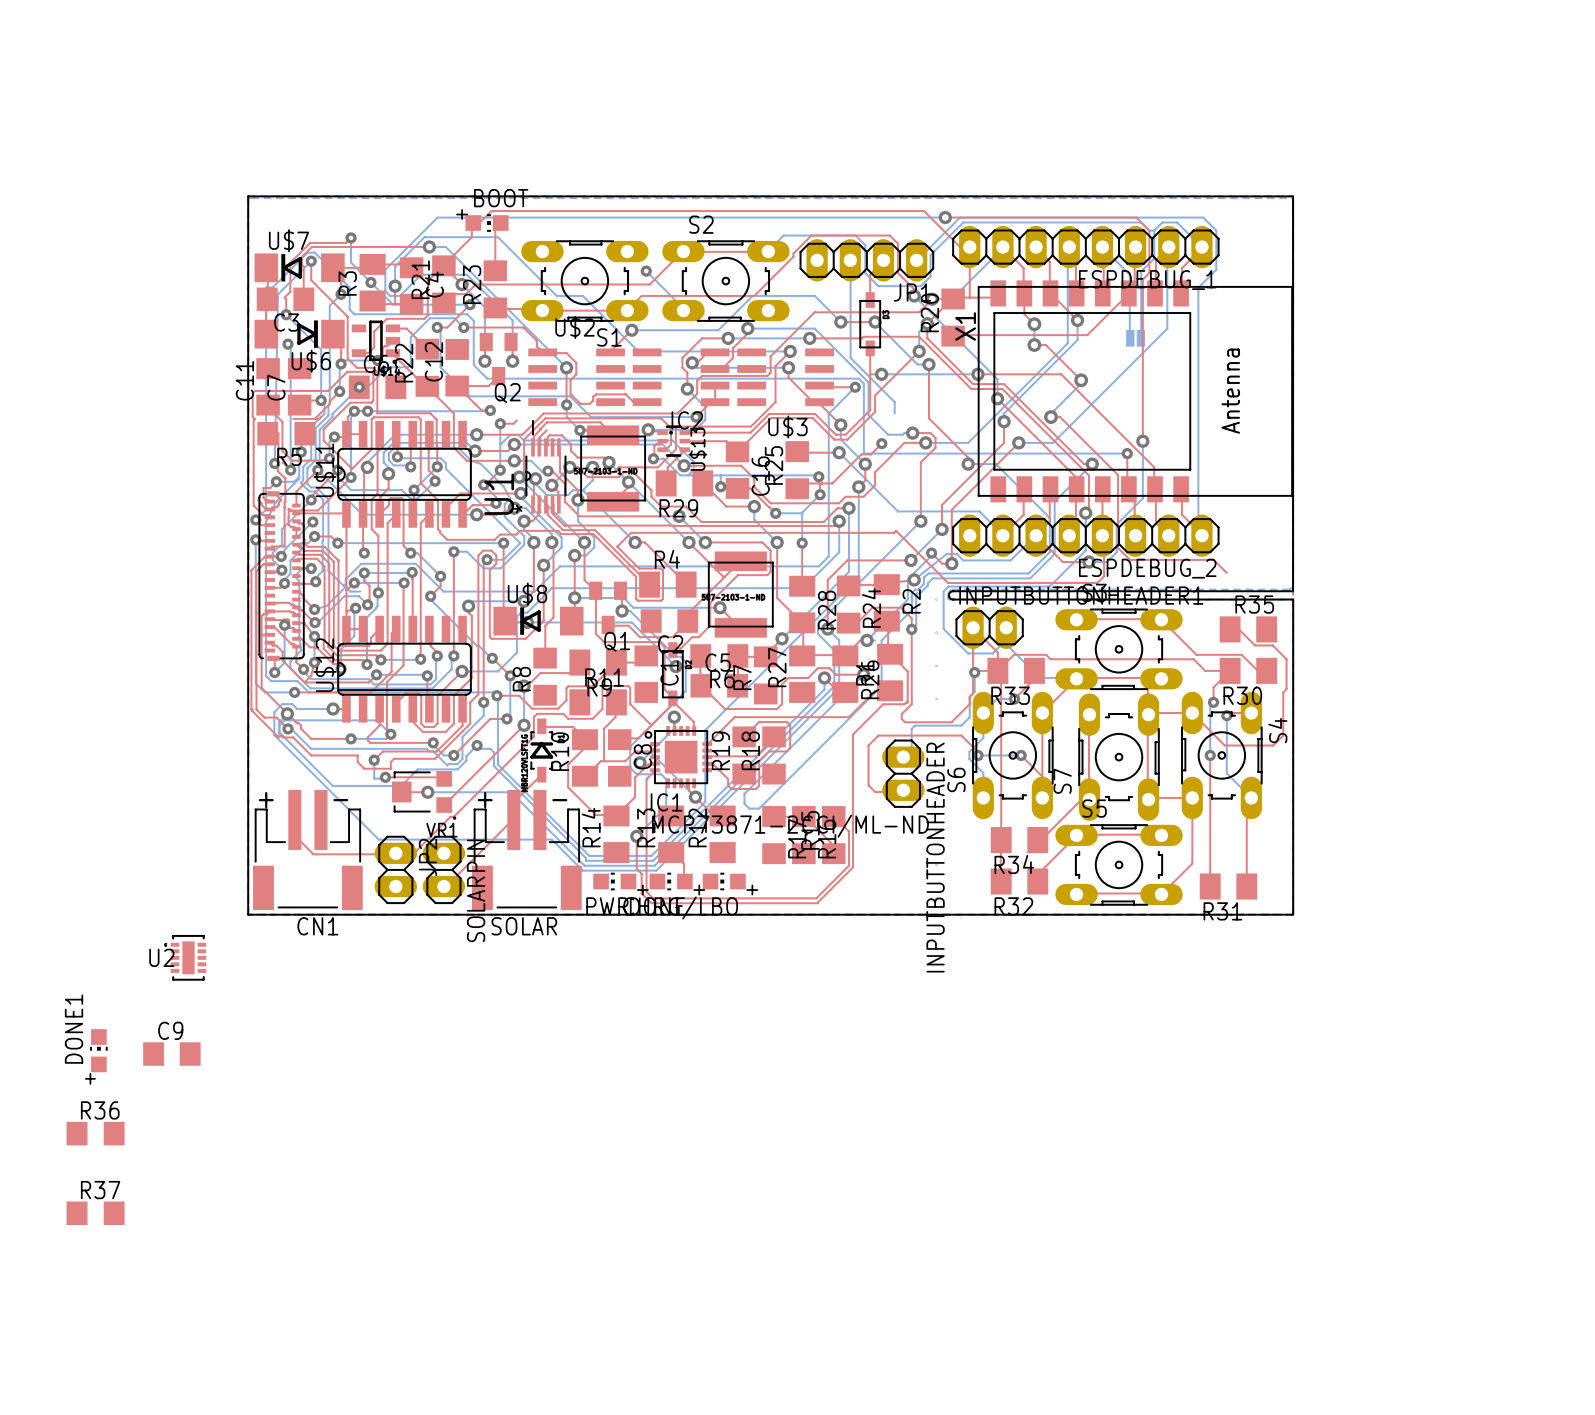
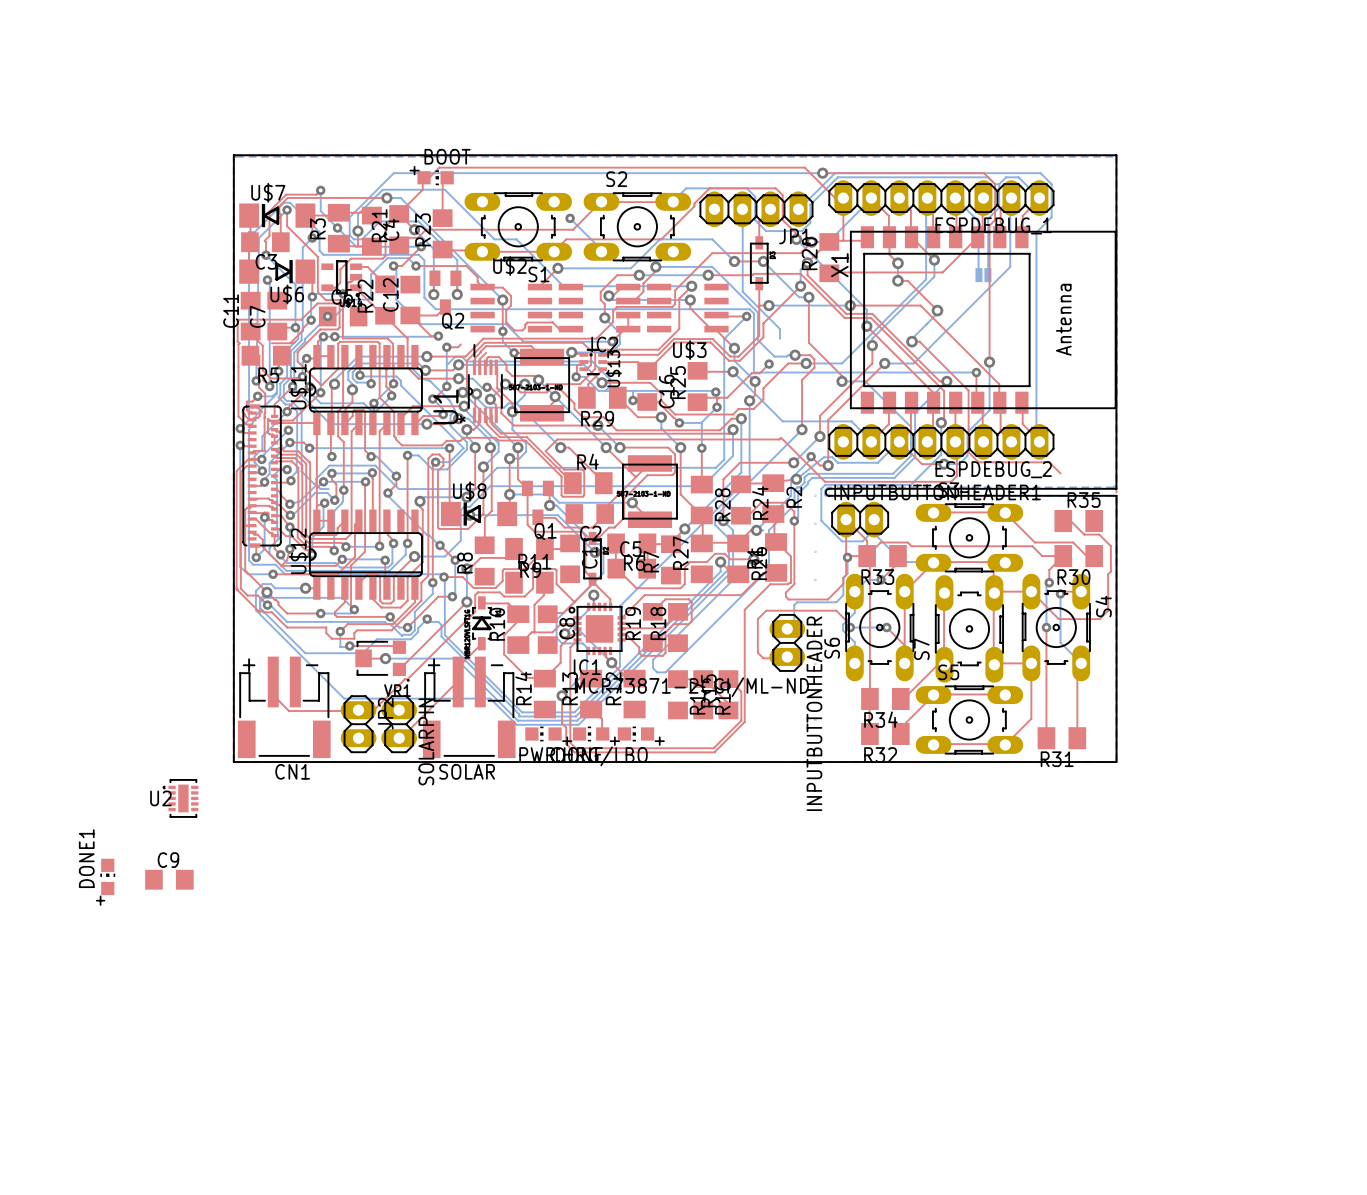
R36: (95, 1133) -> none
R37: (95, 1213) -> none

